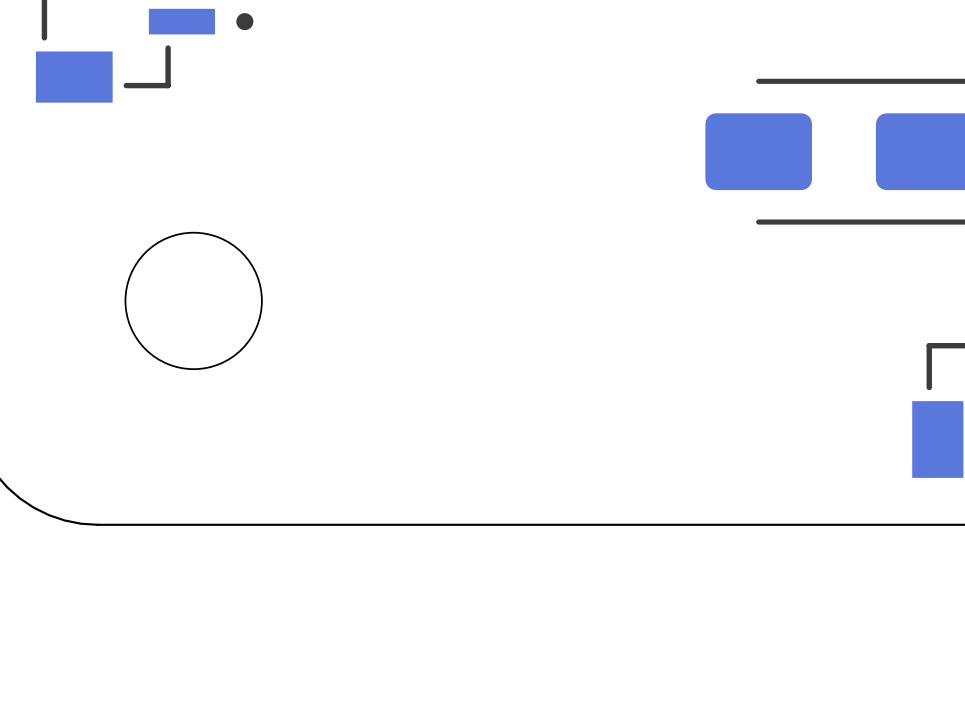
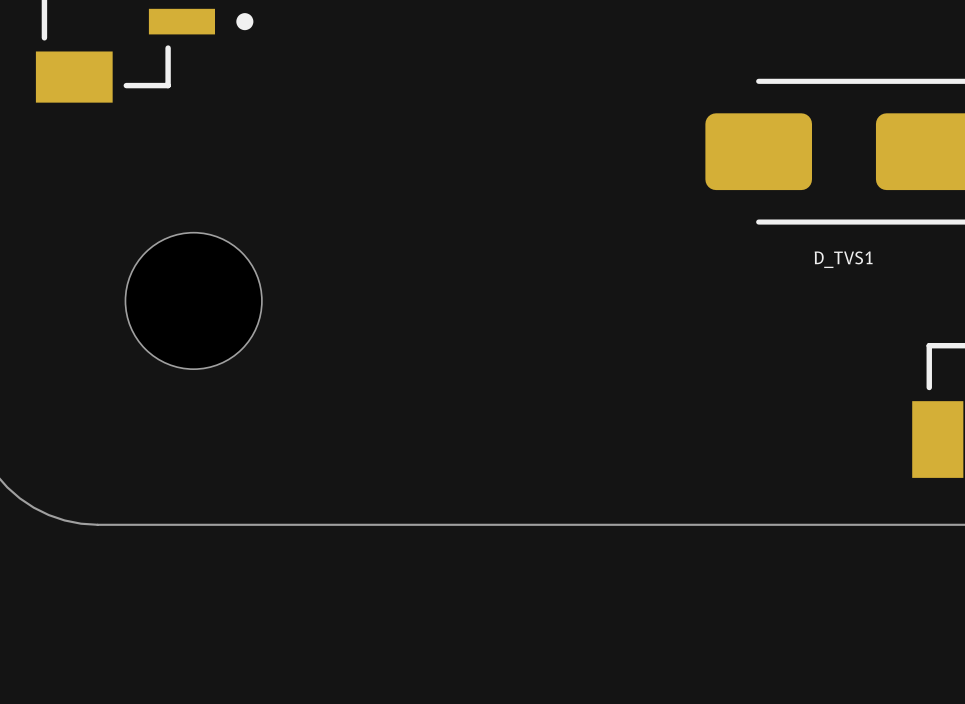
D_TVS1 name: none -> D_TVS1 (843, 259)

